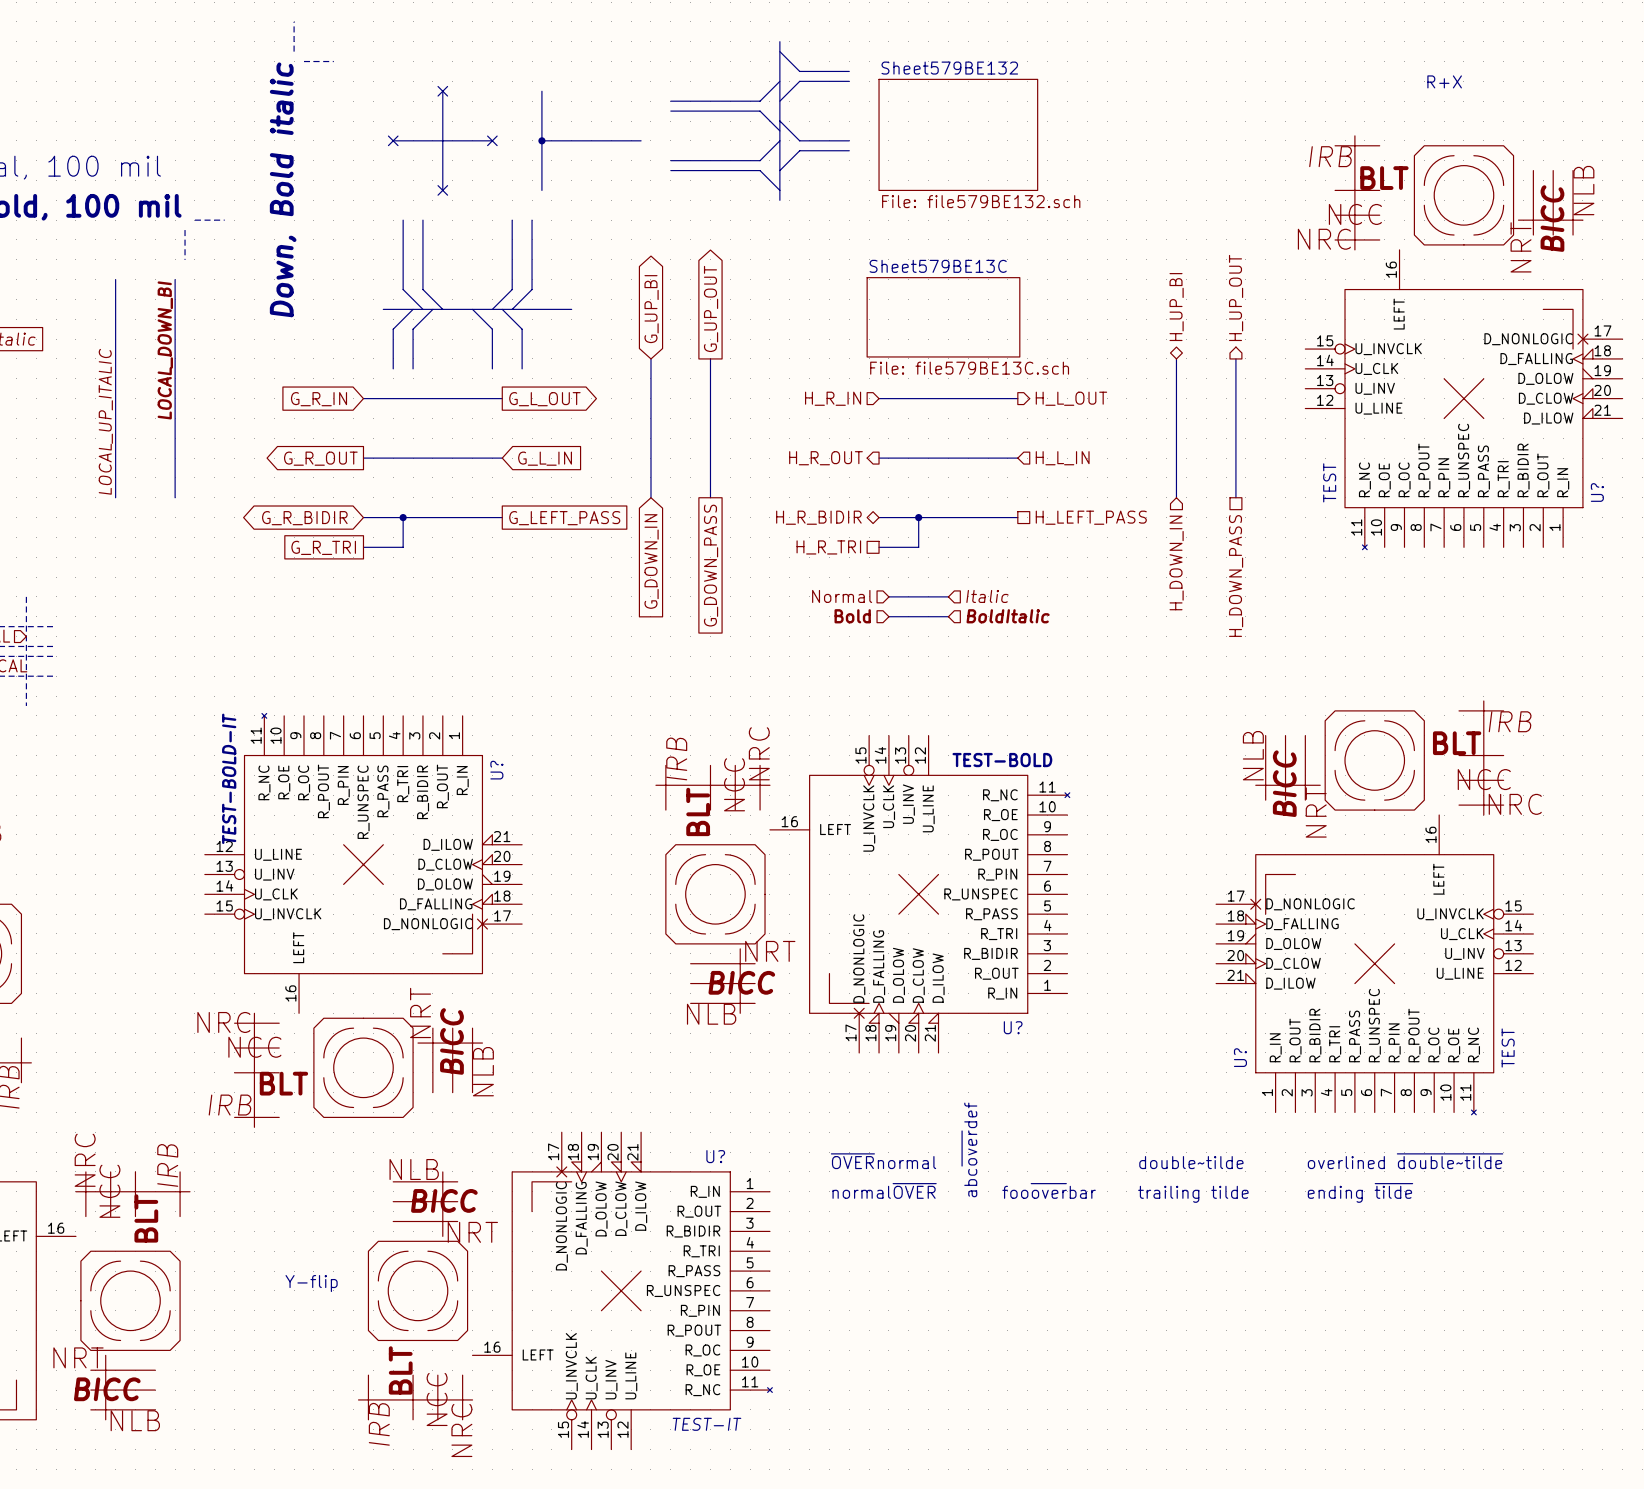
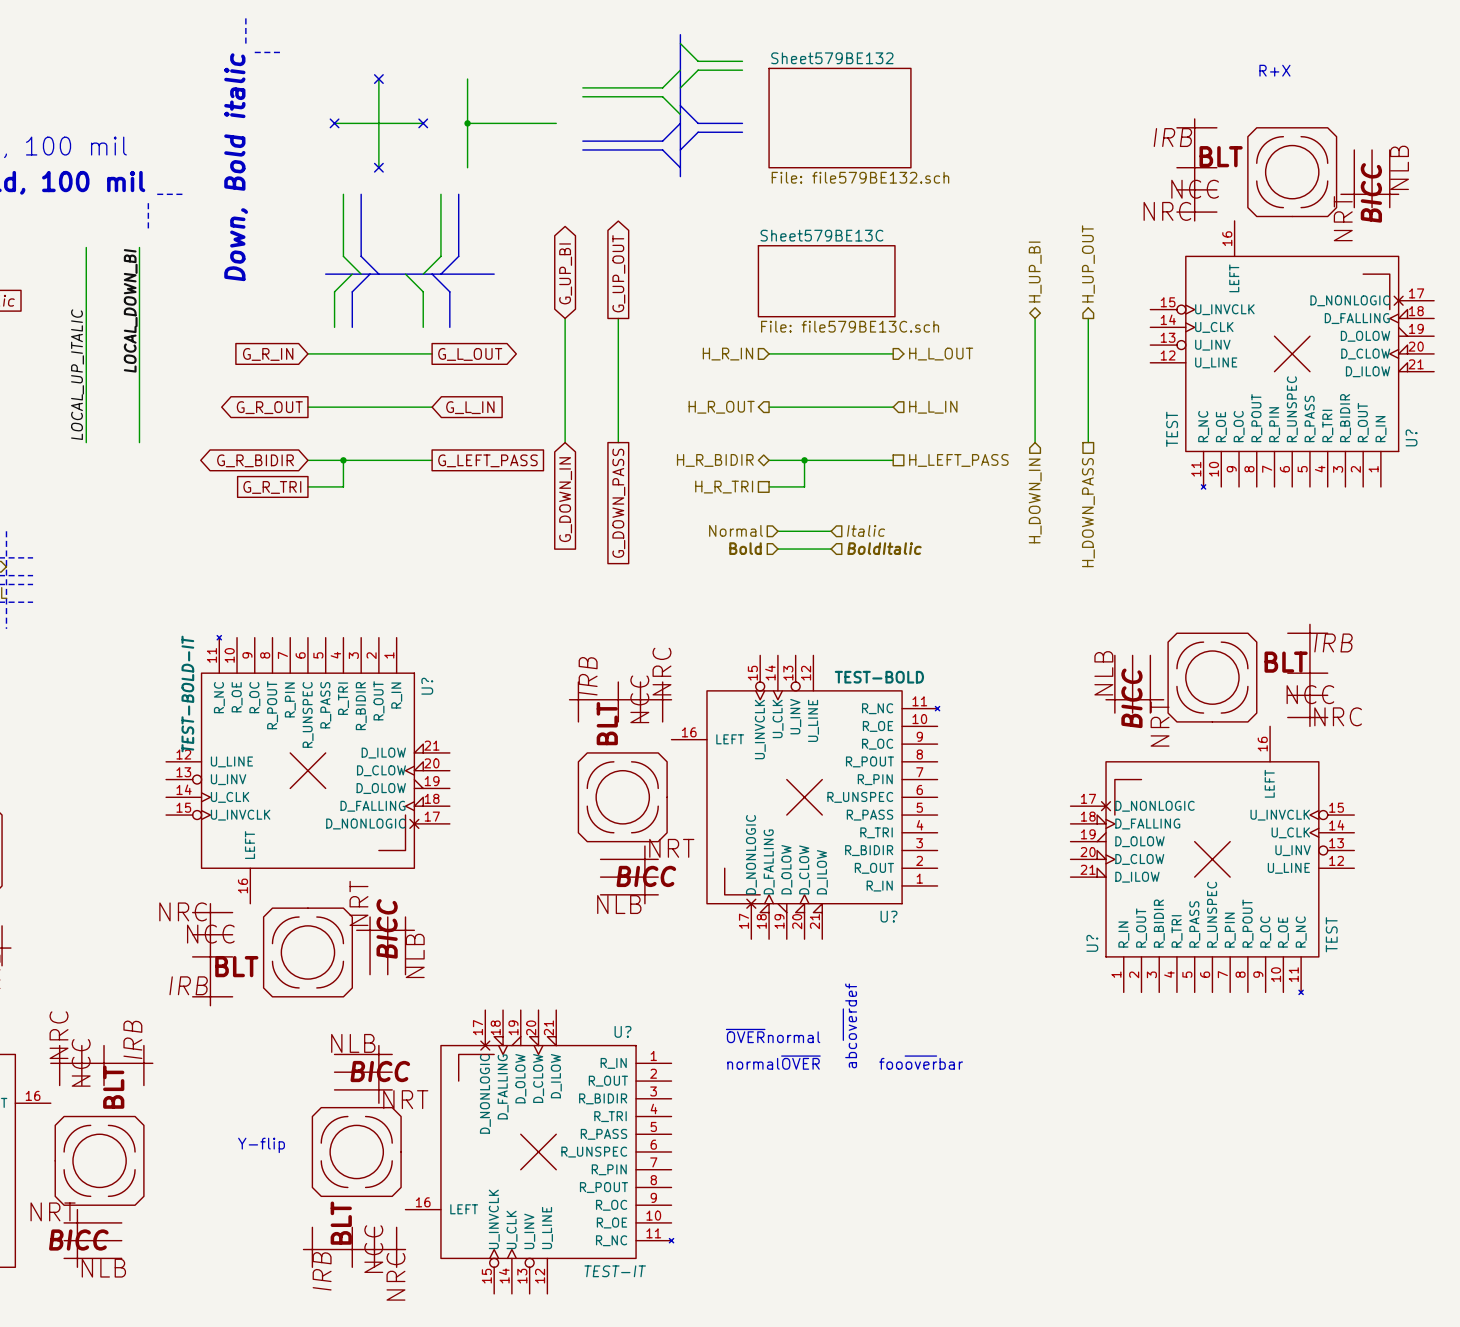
text: overlined ~{double~tilde} (1405, 1161) -> none
text: double~tilde (1191, 1162) -> none
text: ending ~{tilde} (1360, 1192) -> none
text: trailing tilde (1193, 1194) -> none

